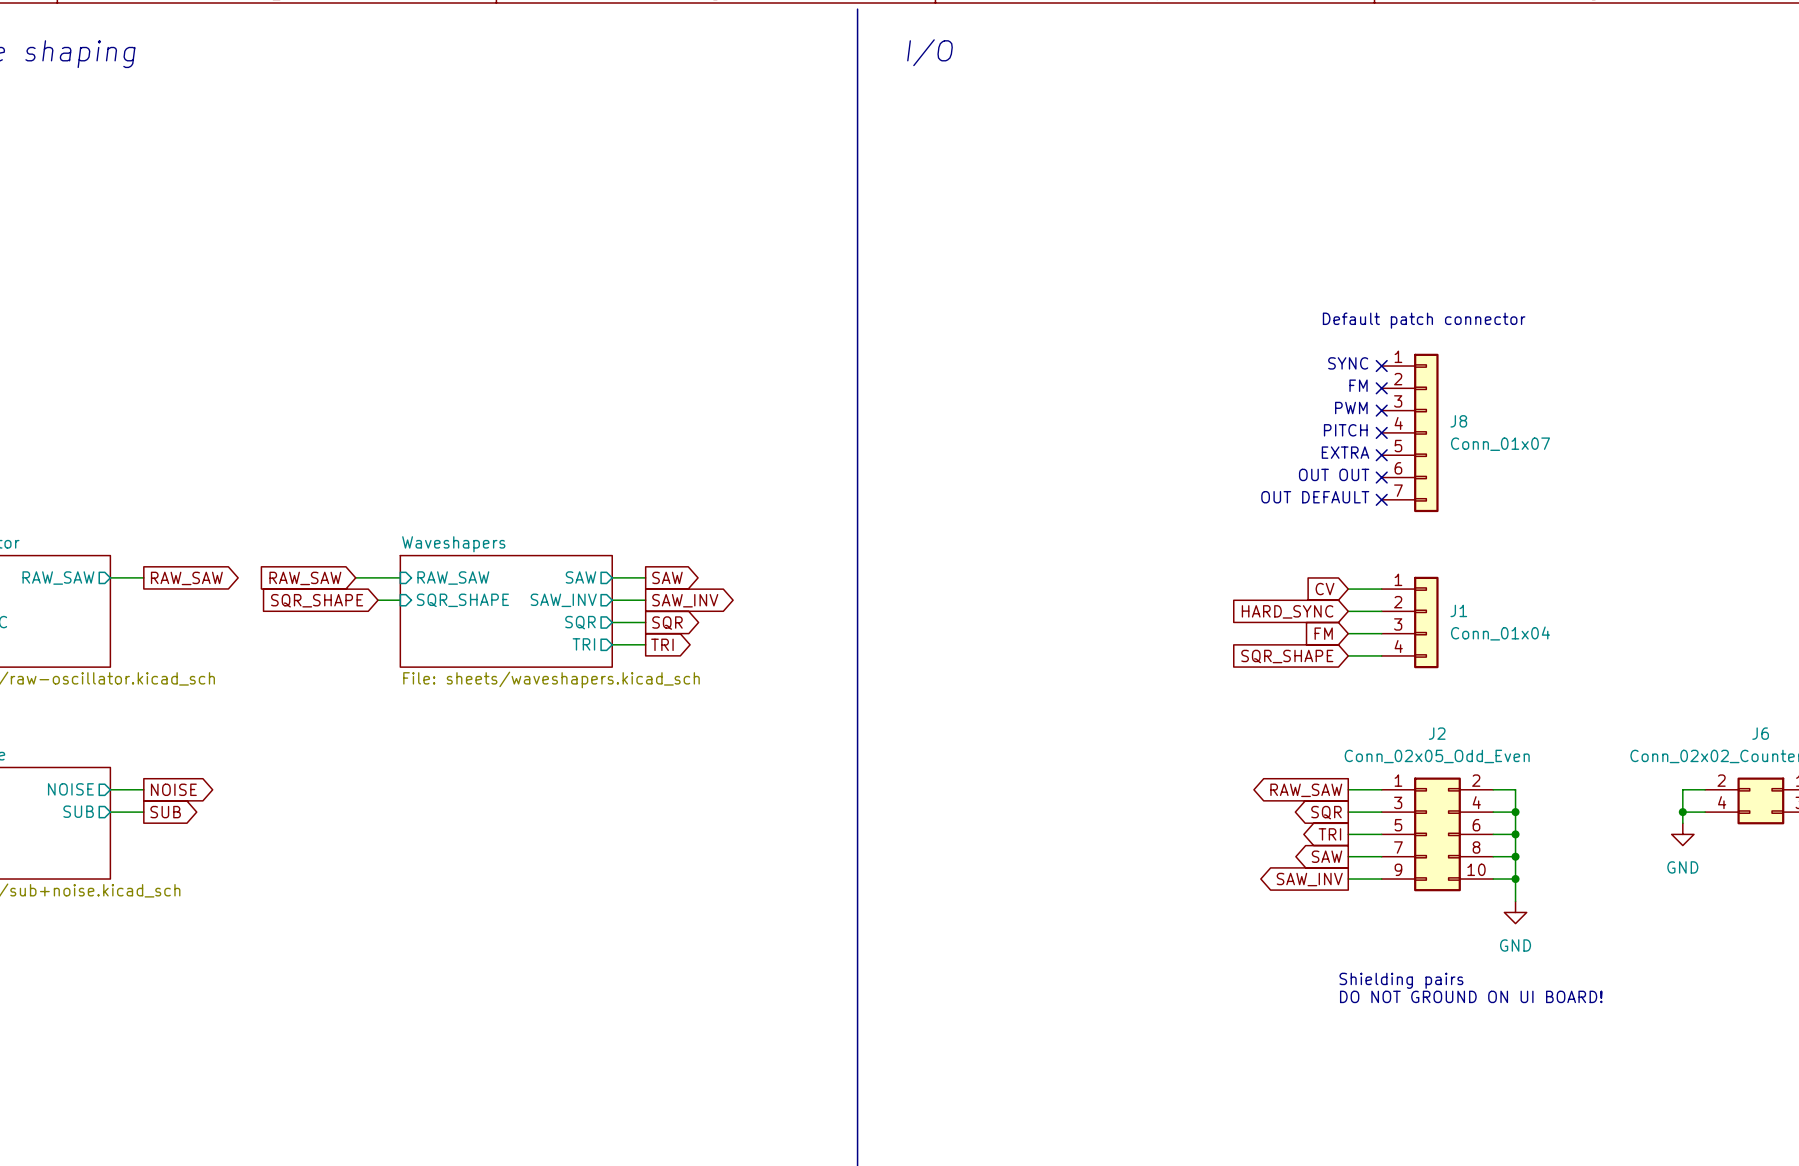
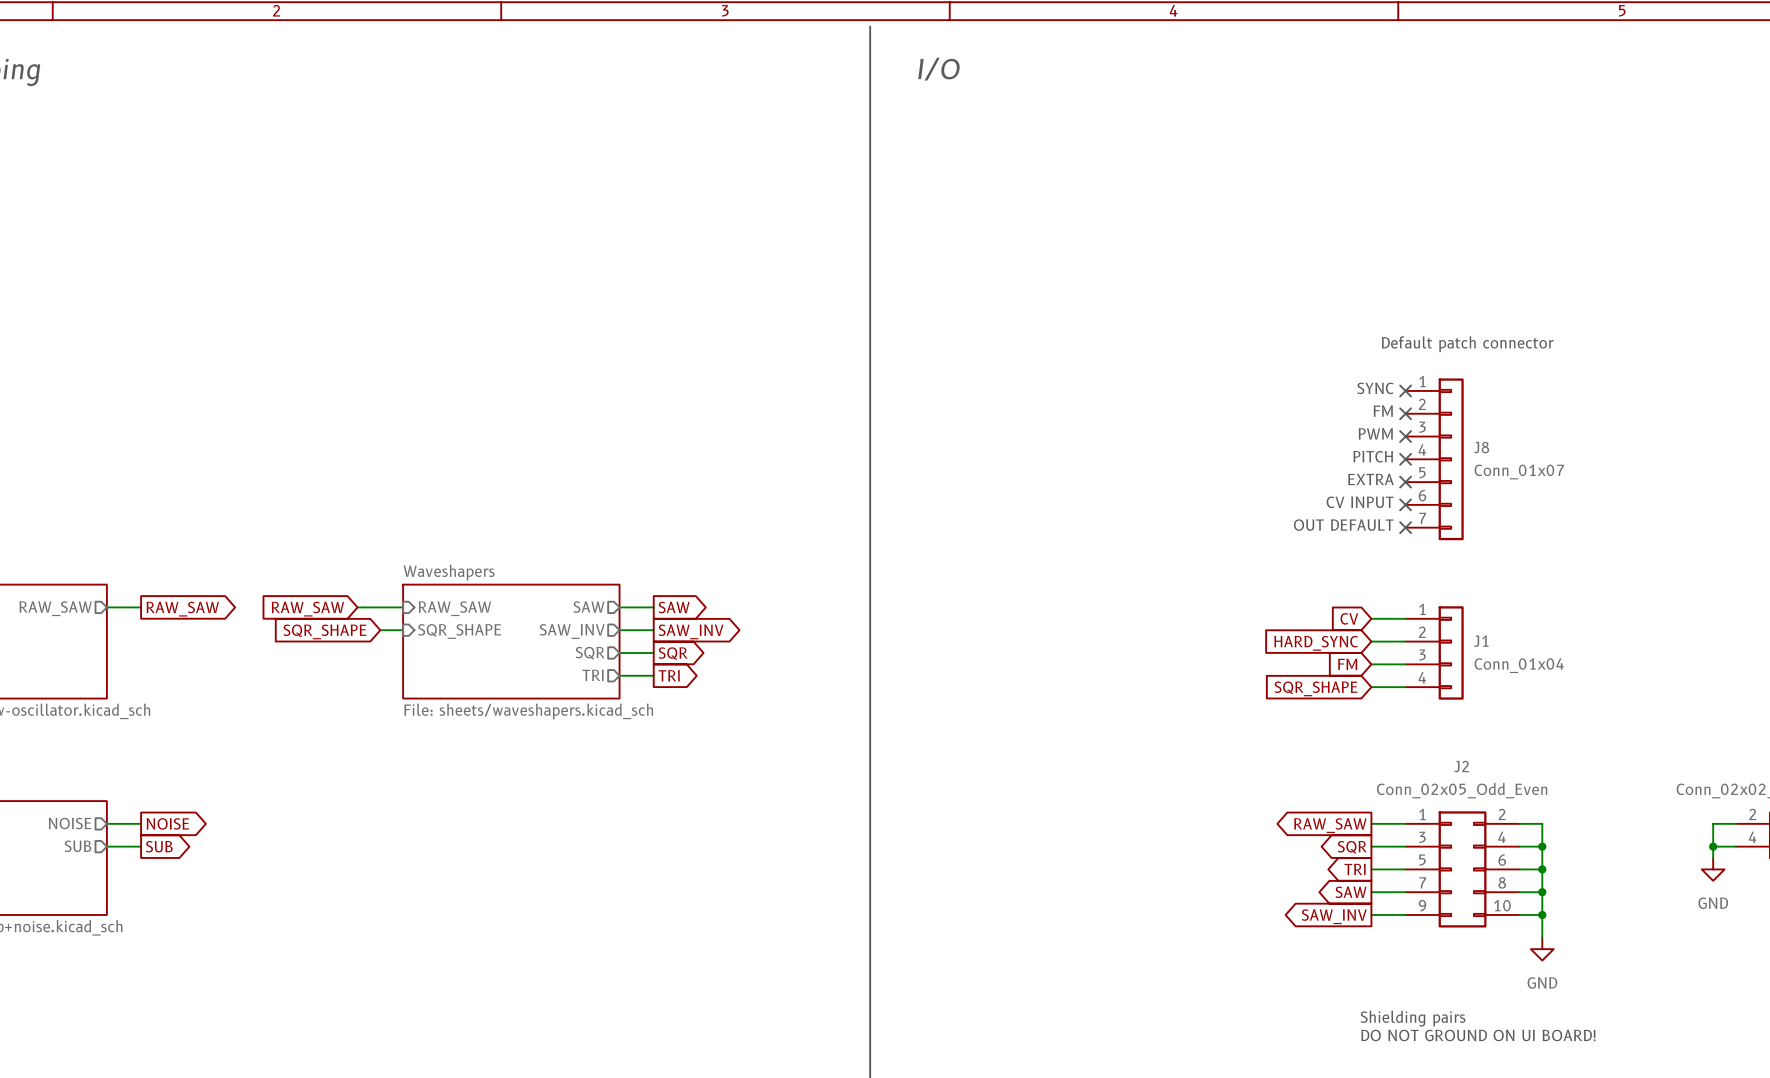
text: OUT OUT (1334, 474) -> CV INPUT (1360, 502)

